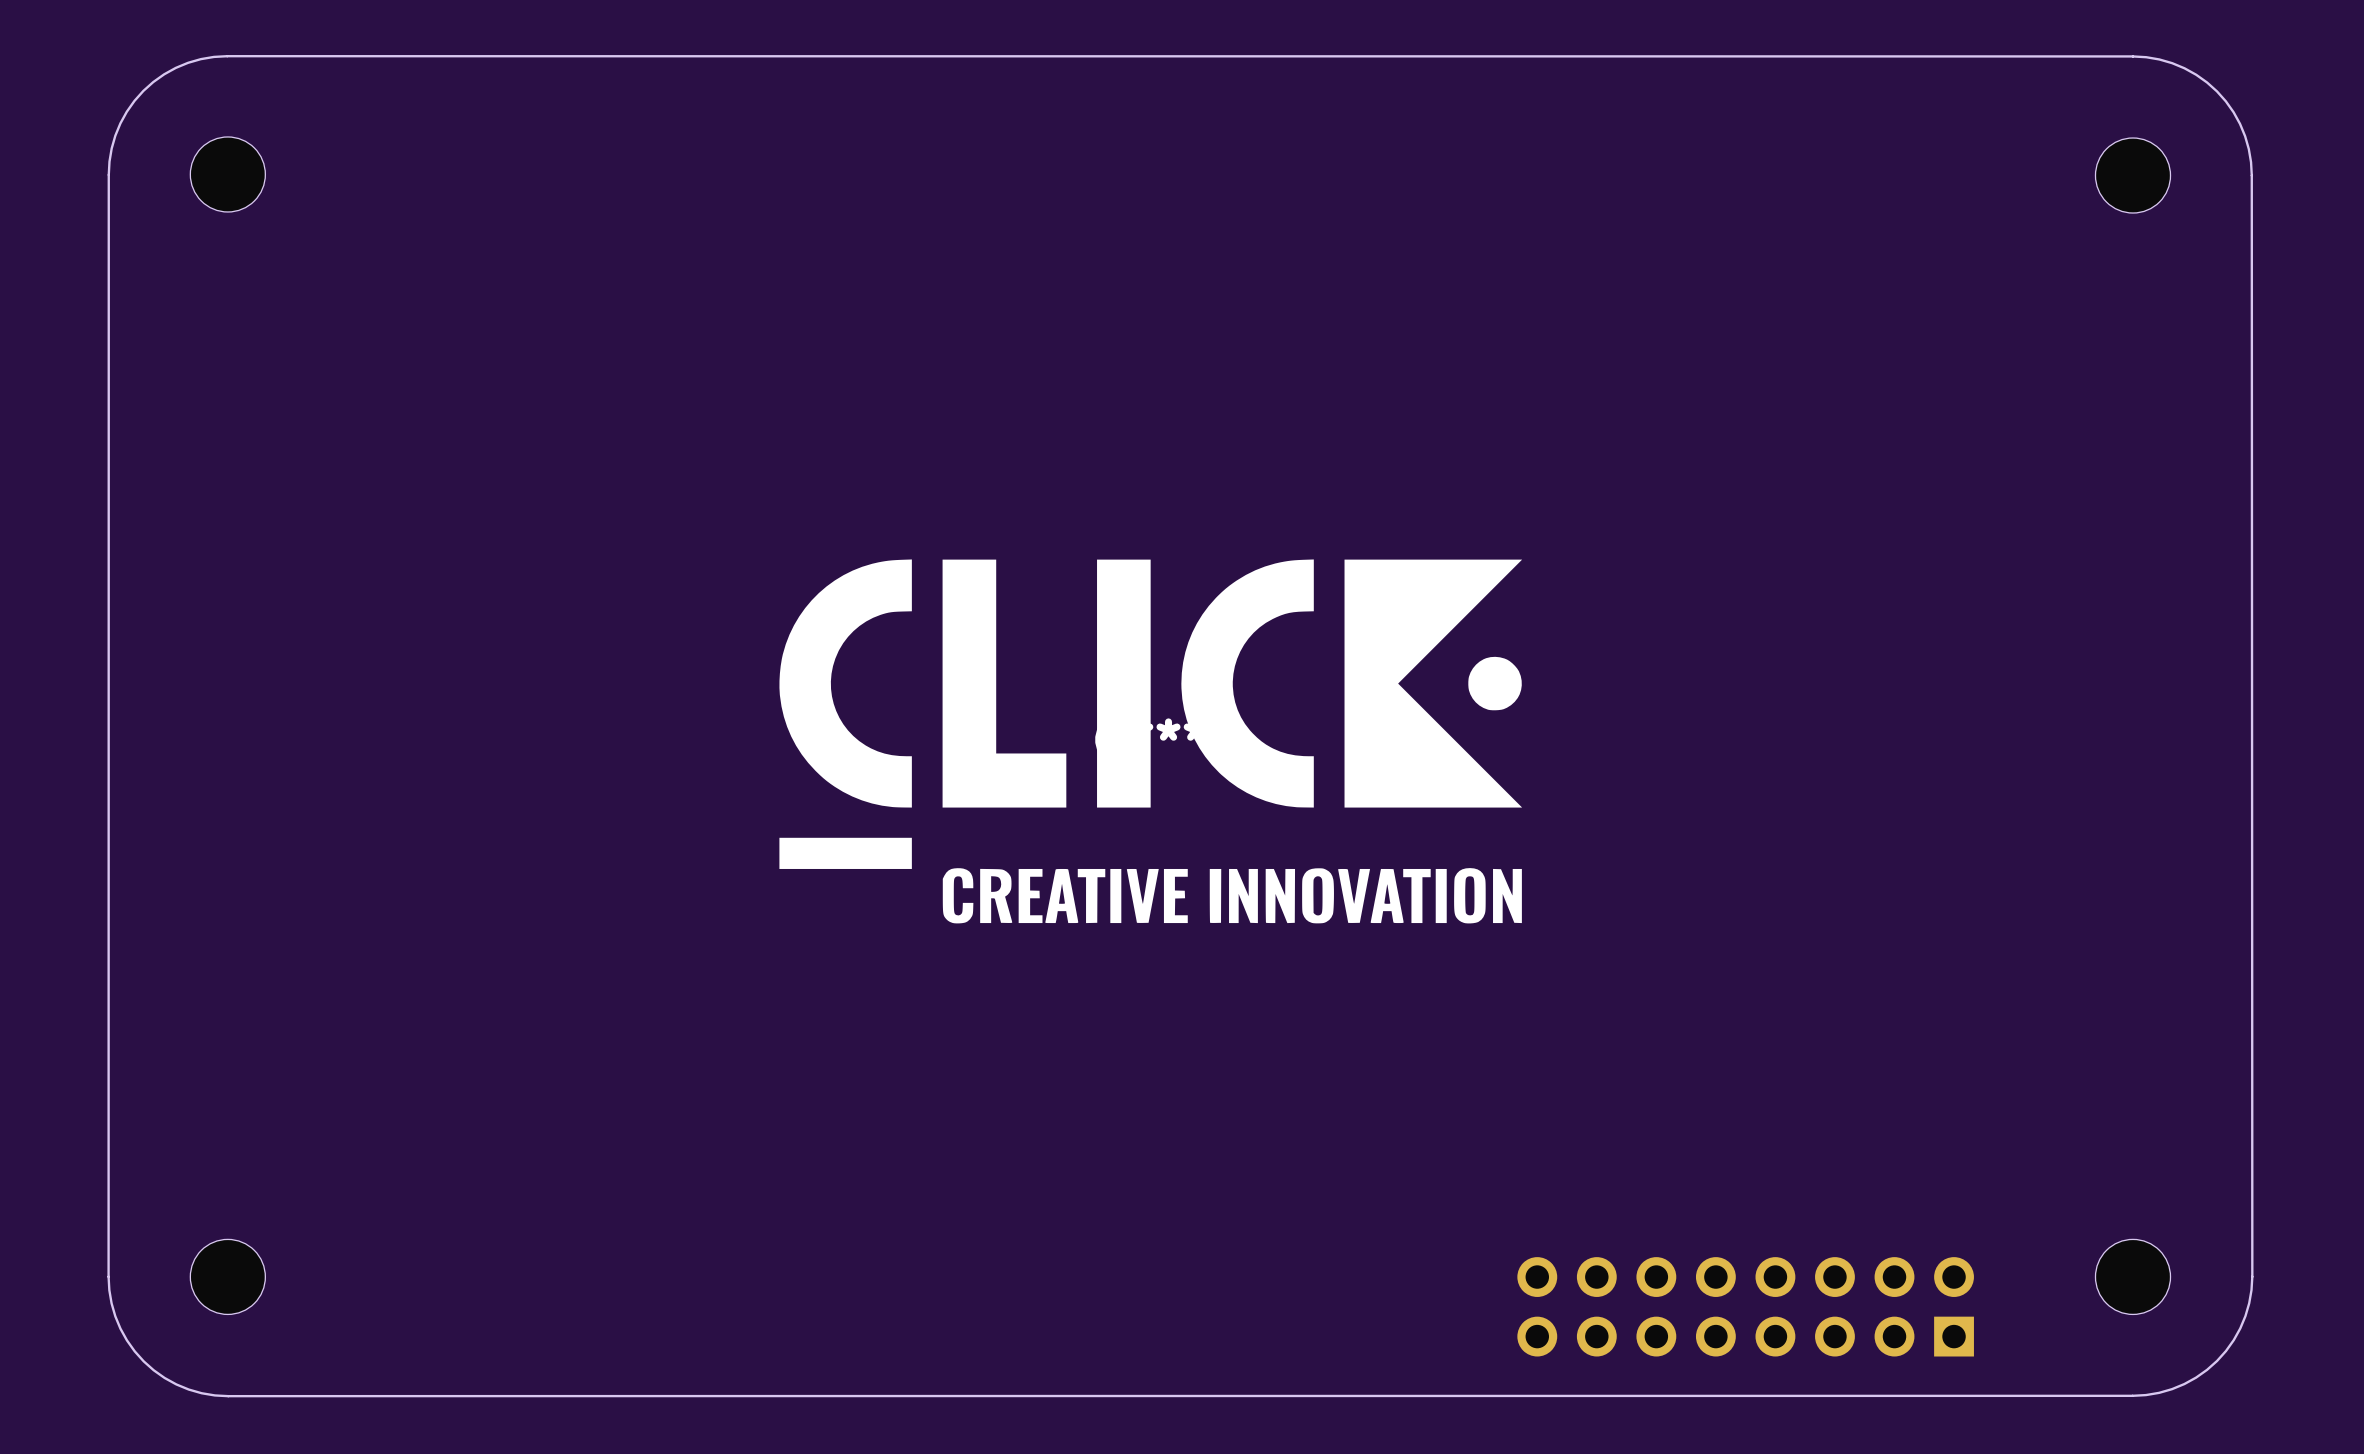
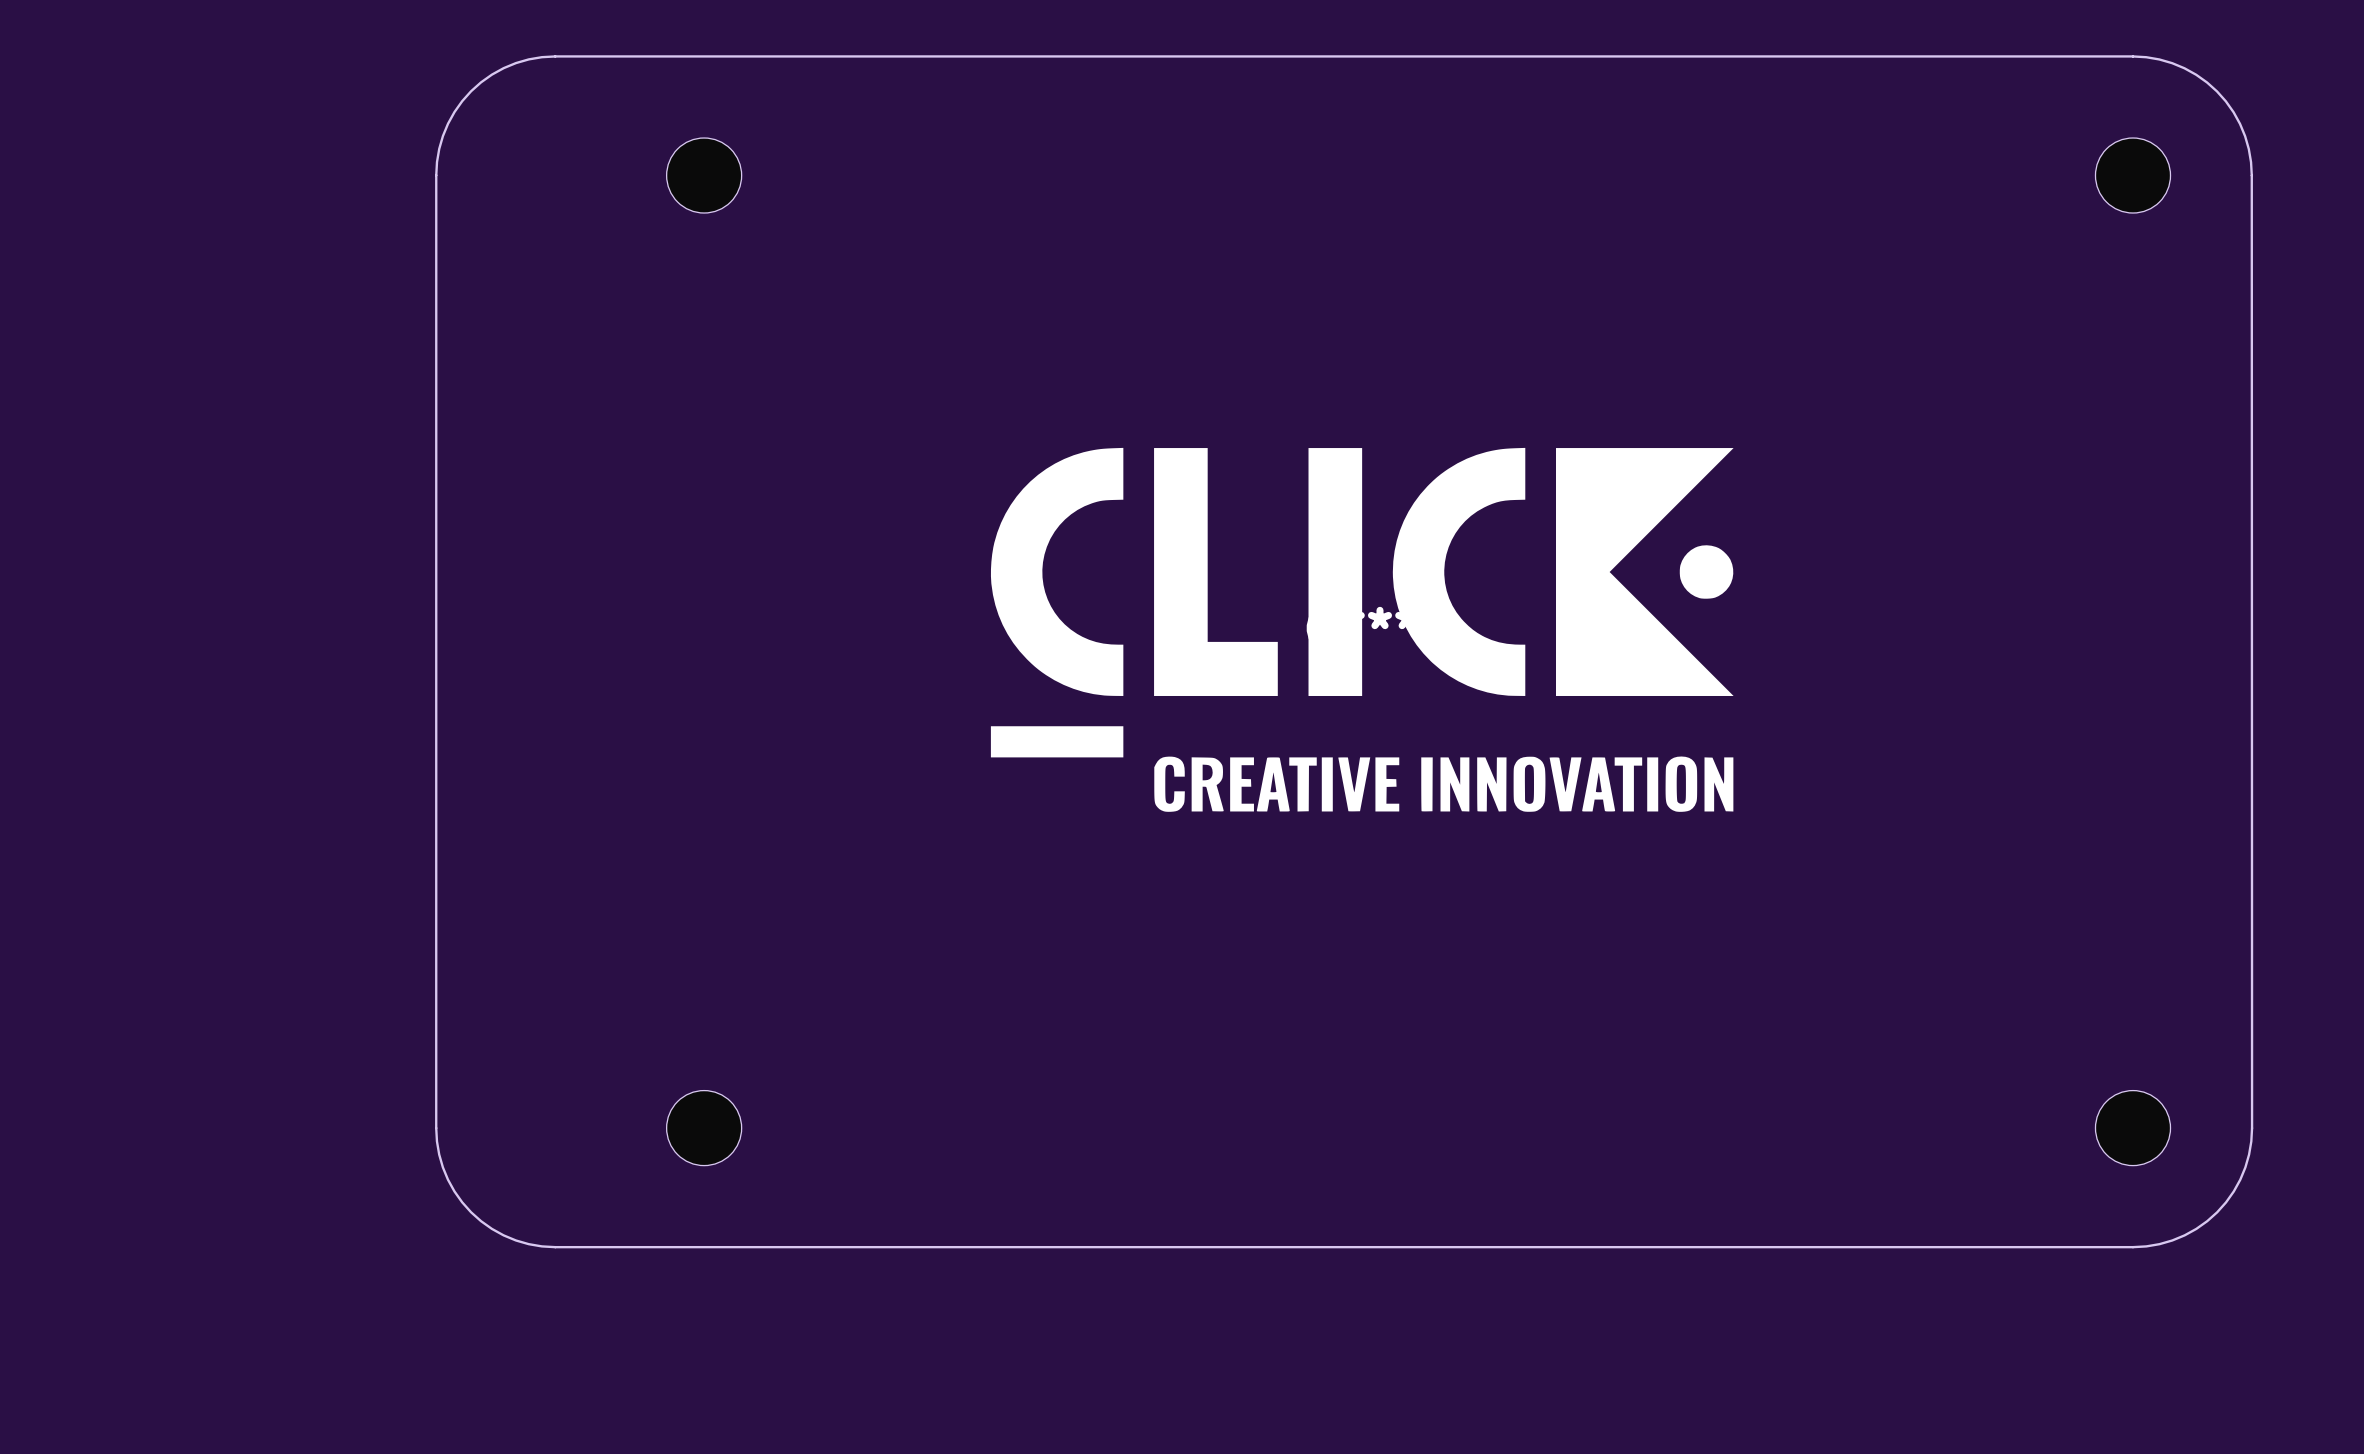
board edge: (2132, 56) (227, 56) (188, 62) (164, 74) (134, 100) (120, 123) (111, 148) (108, 174) (108, 1276) (109, 1290) (115, 1316) (126, 1340) (143, 1361) (164, 1377) (188, 1389) (201, 1393) (228, 1396) (2132, 1395) (2159, 1392) (2184, 1384) (2207, 1369) (2233, 1340) (2245, 1316) (2252, 1276) (2251, 175) -> (2132, 56) (555, 56) (515, 63) (491, 74) (471, 91) (454, 112) (442, 136) (436, 175) (436, 1128) (442, 1167) (454, 1191) (471, 1212) (503, 1235) (528, 1244) (555, 1247) (2132, 1247) (2159, 1244) (2196, 1228) (2217, 1212) (2233, 1191) (2245, 1167) (2252, 1128) (2251, 175)
part position: (227, 174) -> (704, 175)
part position: (1150, 741) -> (1362, 629)
part position: (227, 1276) -> (704, 1128)
part position: (2132, 1276) -> (2132, 1128)
part: (1745, 1306) -> none

